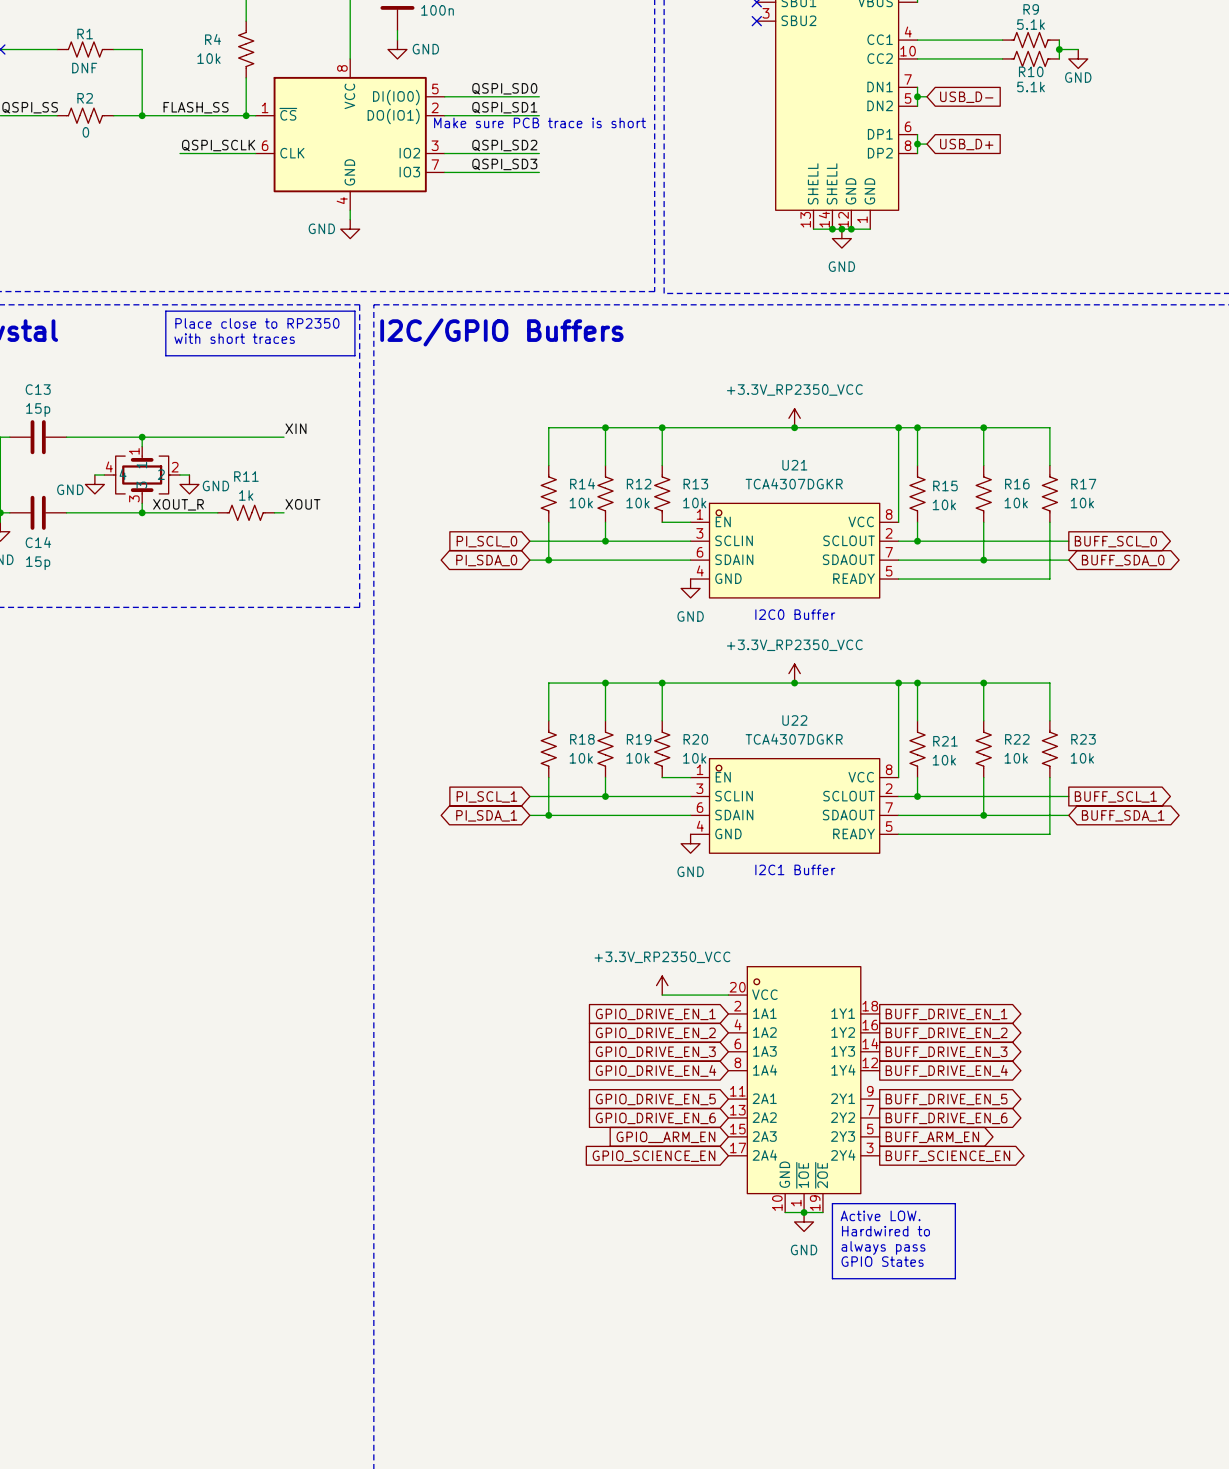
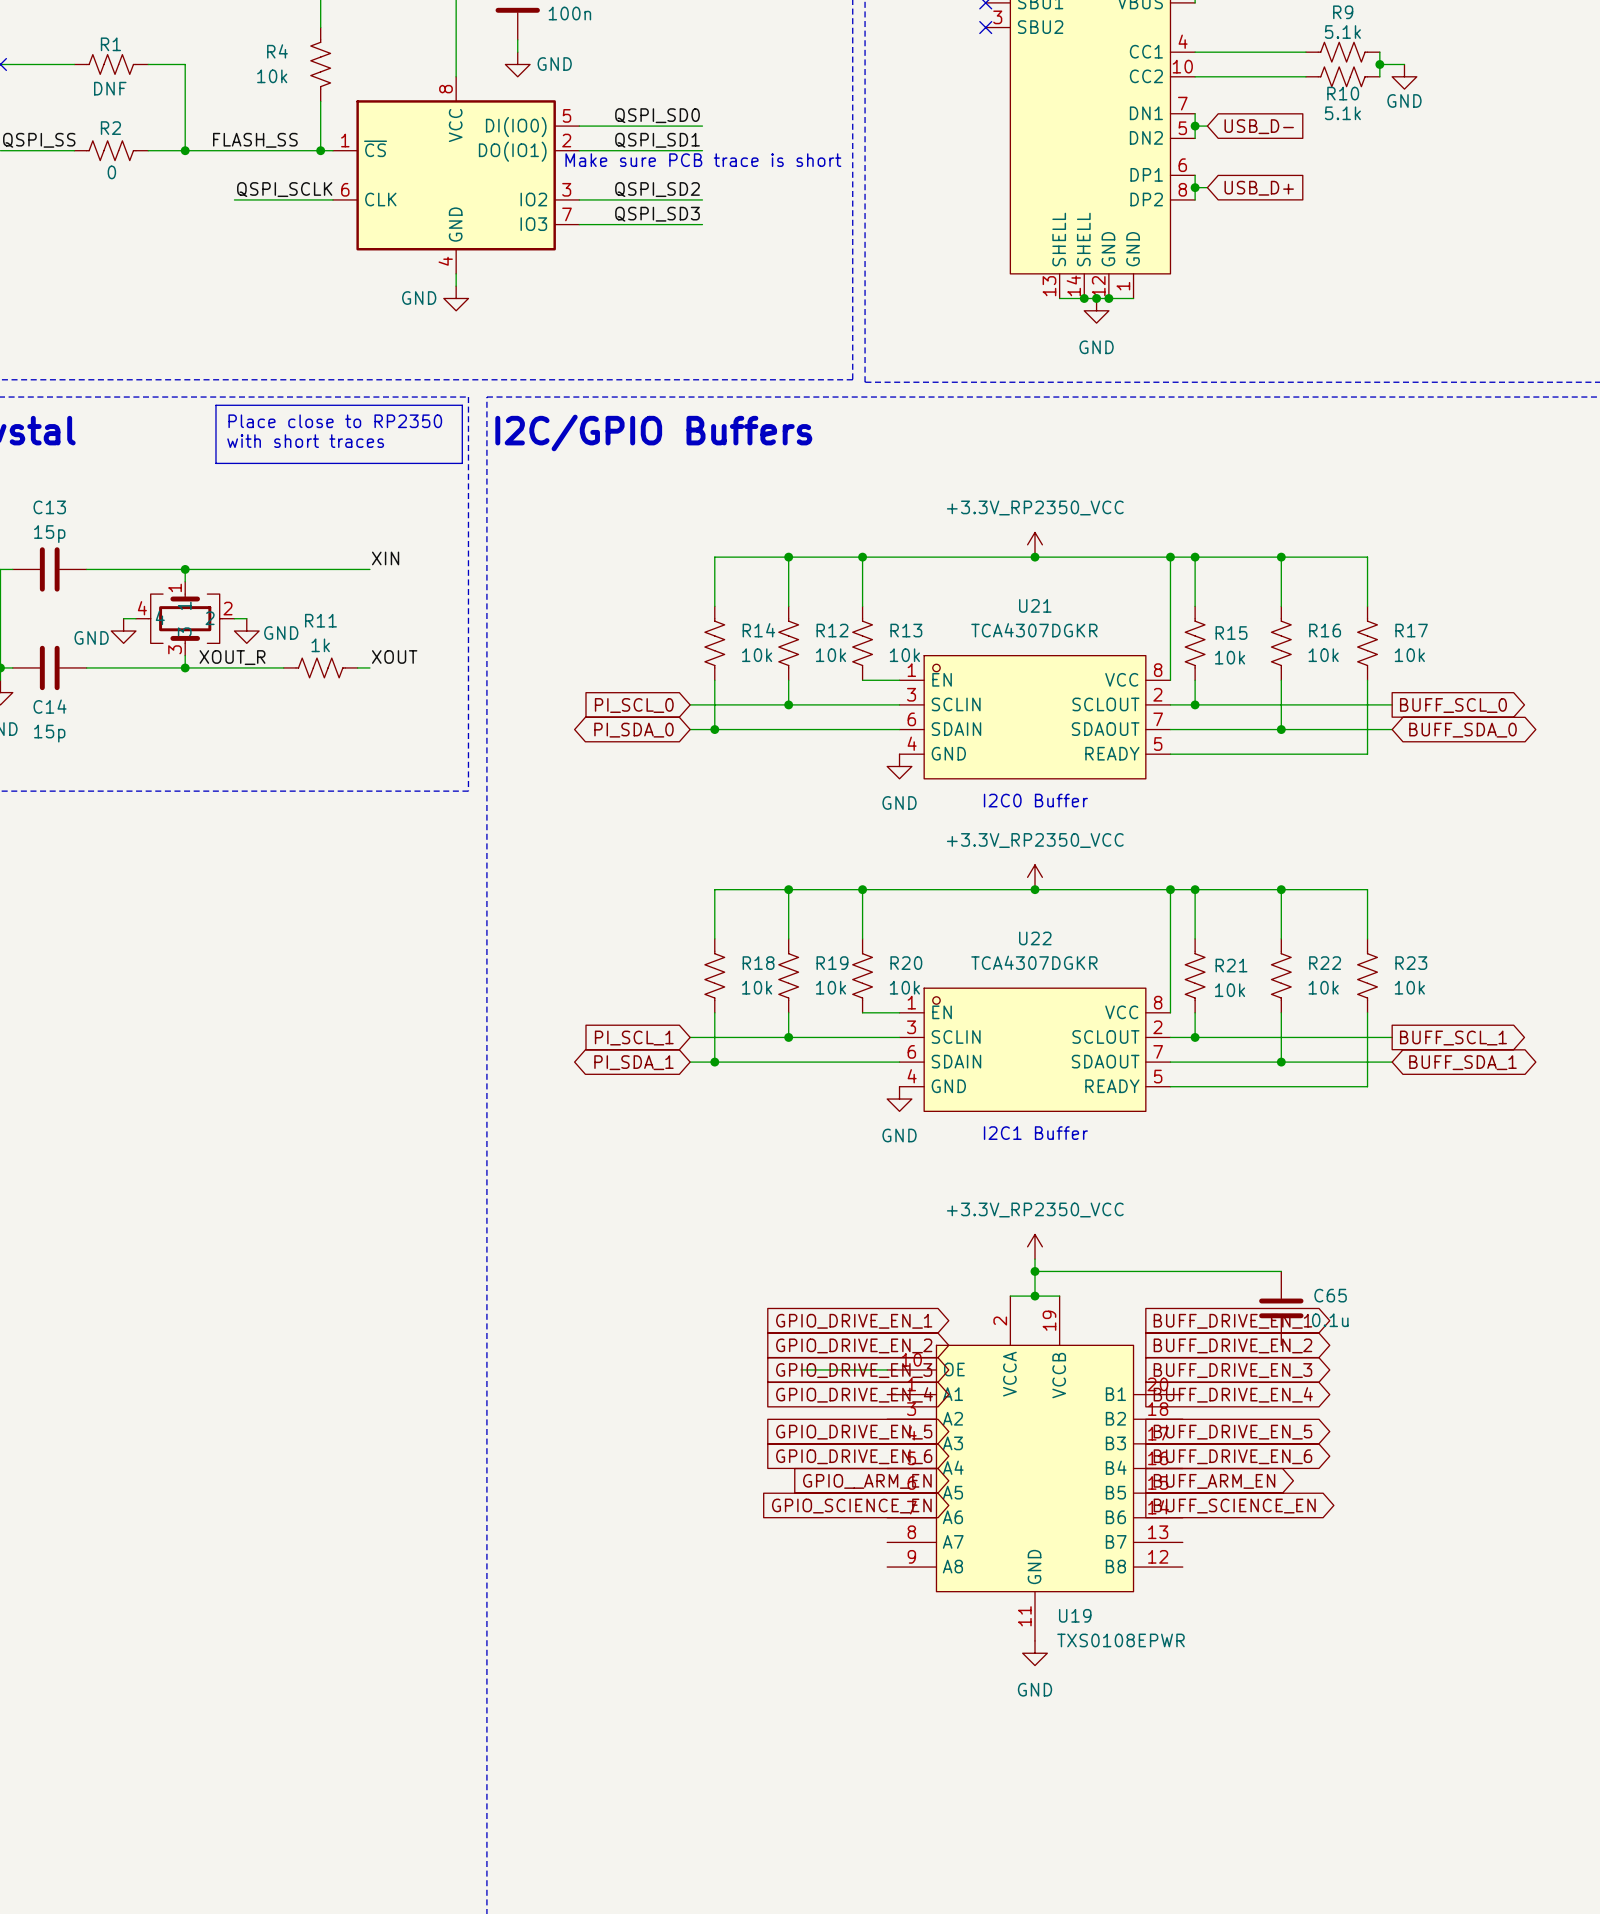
wire: none -> (1035, 1271) (1281, 1271)
junction: none -> (1035, 1271)
power symbol position: +3.3V_RP2350_VCC (662, 985) -> +3.3V_RP2350_VCC (1035, 1246)
wire: (662, 995) (728, 995) -> (800, 1369) (887, 1369)
junction: none -> (1035, 1296)
C65: none -> 0.1u (1281, 1308)
part: (804, 1089) -> none
U19: none -> TXS0108EPWR (1035, 1468)
line: (832, 1203) (955, 1203) (955, 1278) (832, 1278) (832, 1203) -> none
junction: (804, 1212) -> none
text: Active LOW. (880, 1215) -> none
power symbol position: GND (804, 1221) -> GND (1035, 1653)
text: Hardwired to (885, 1231) -> none
text: always pass (883, 1247) -> none
text: GPIO States (882, 1261) -> none

